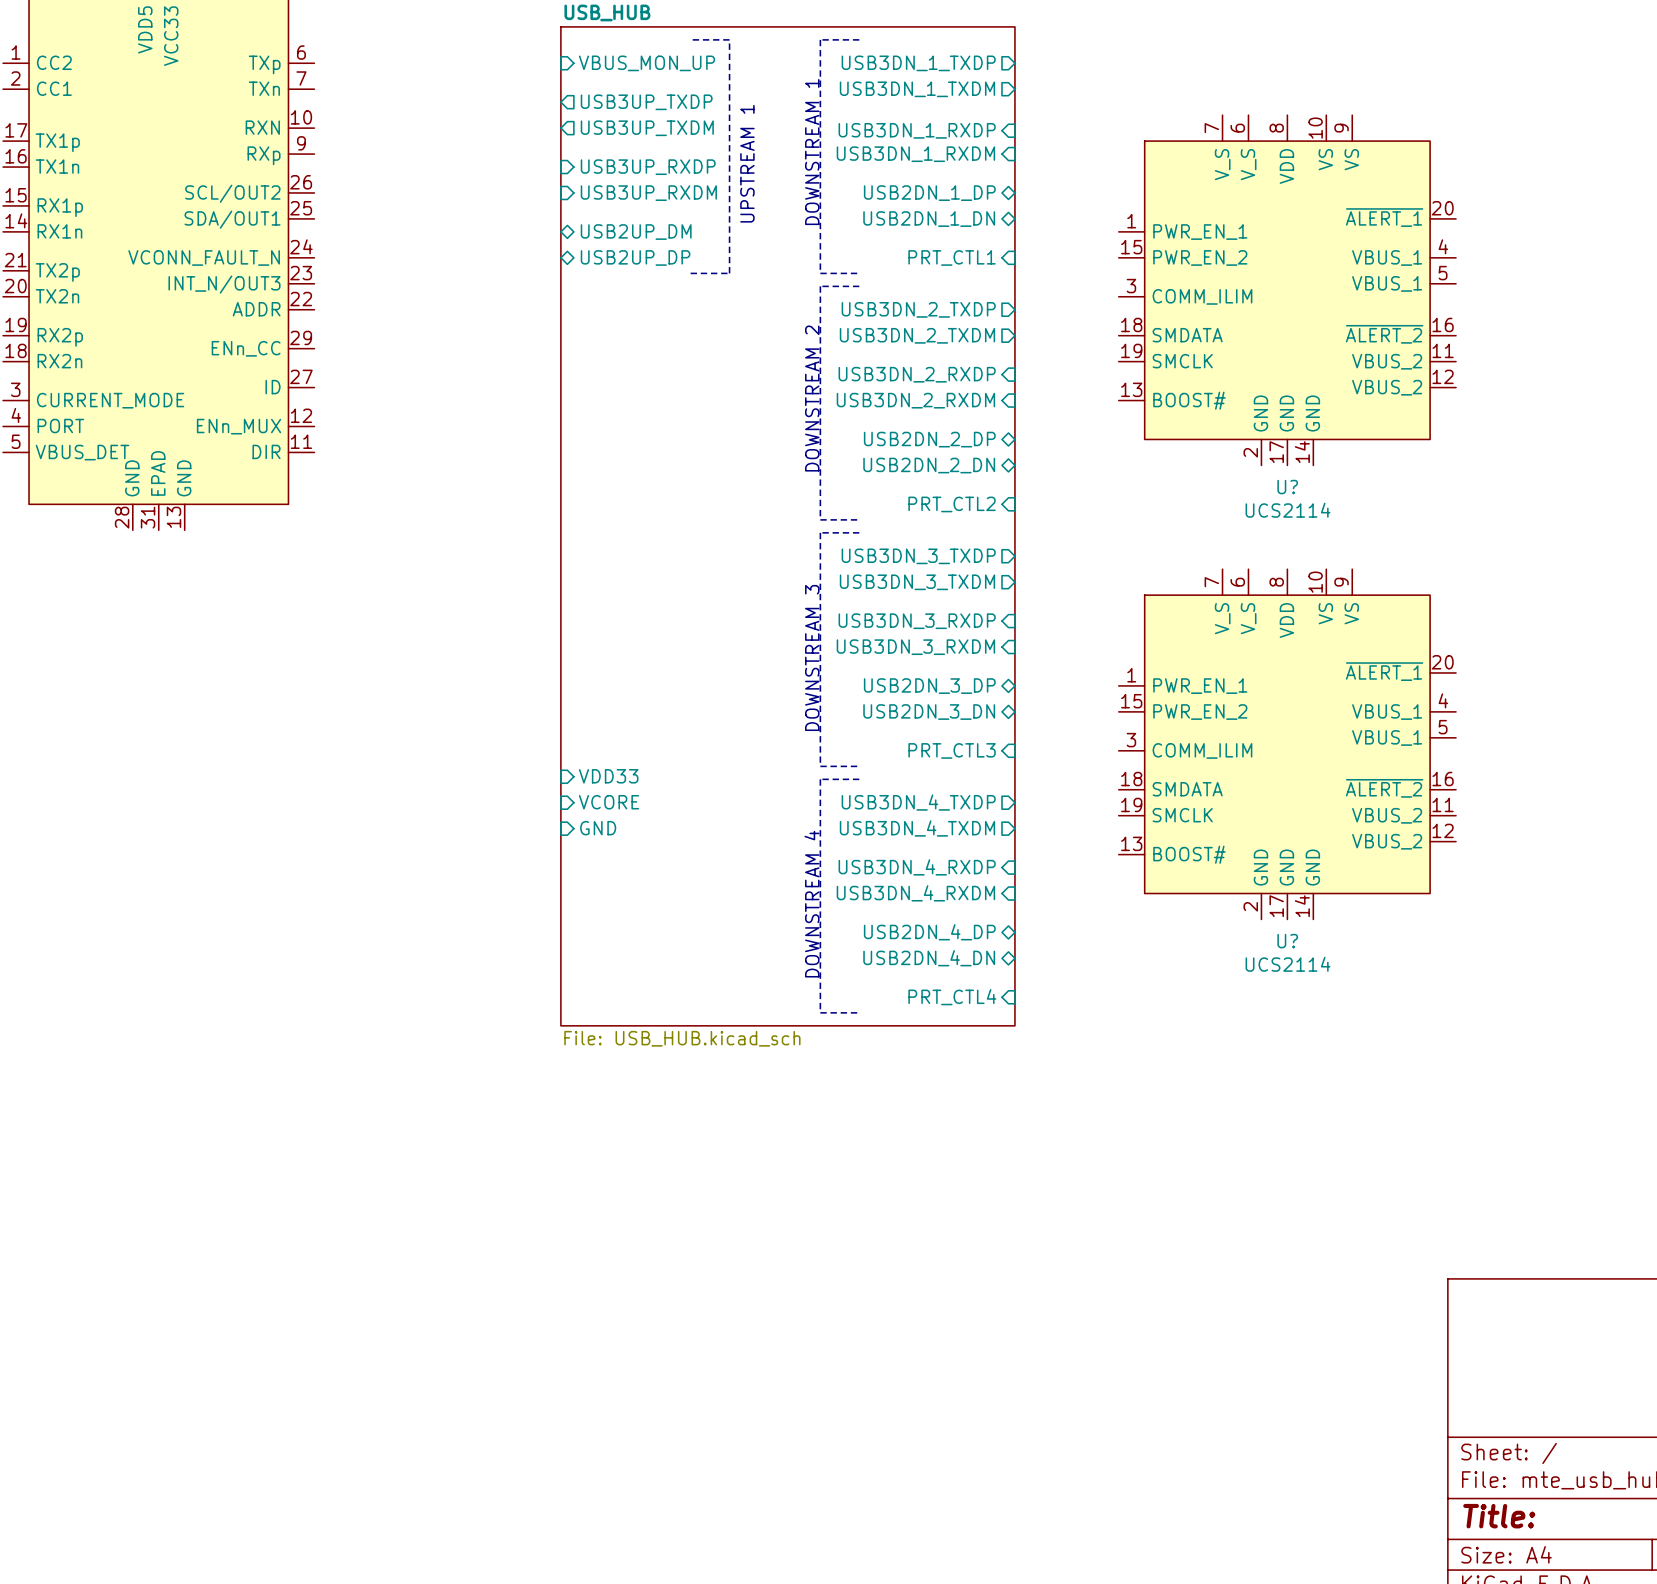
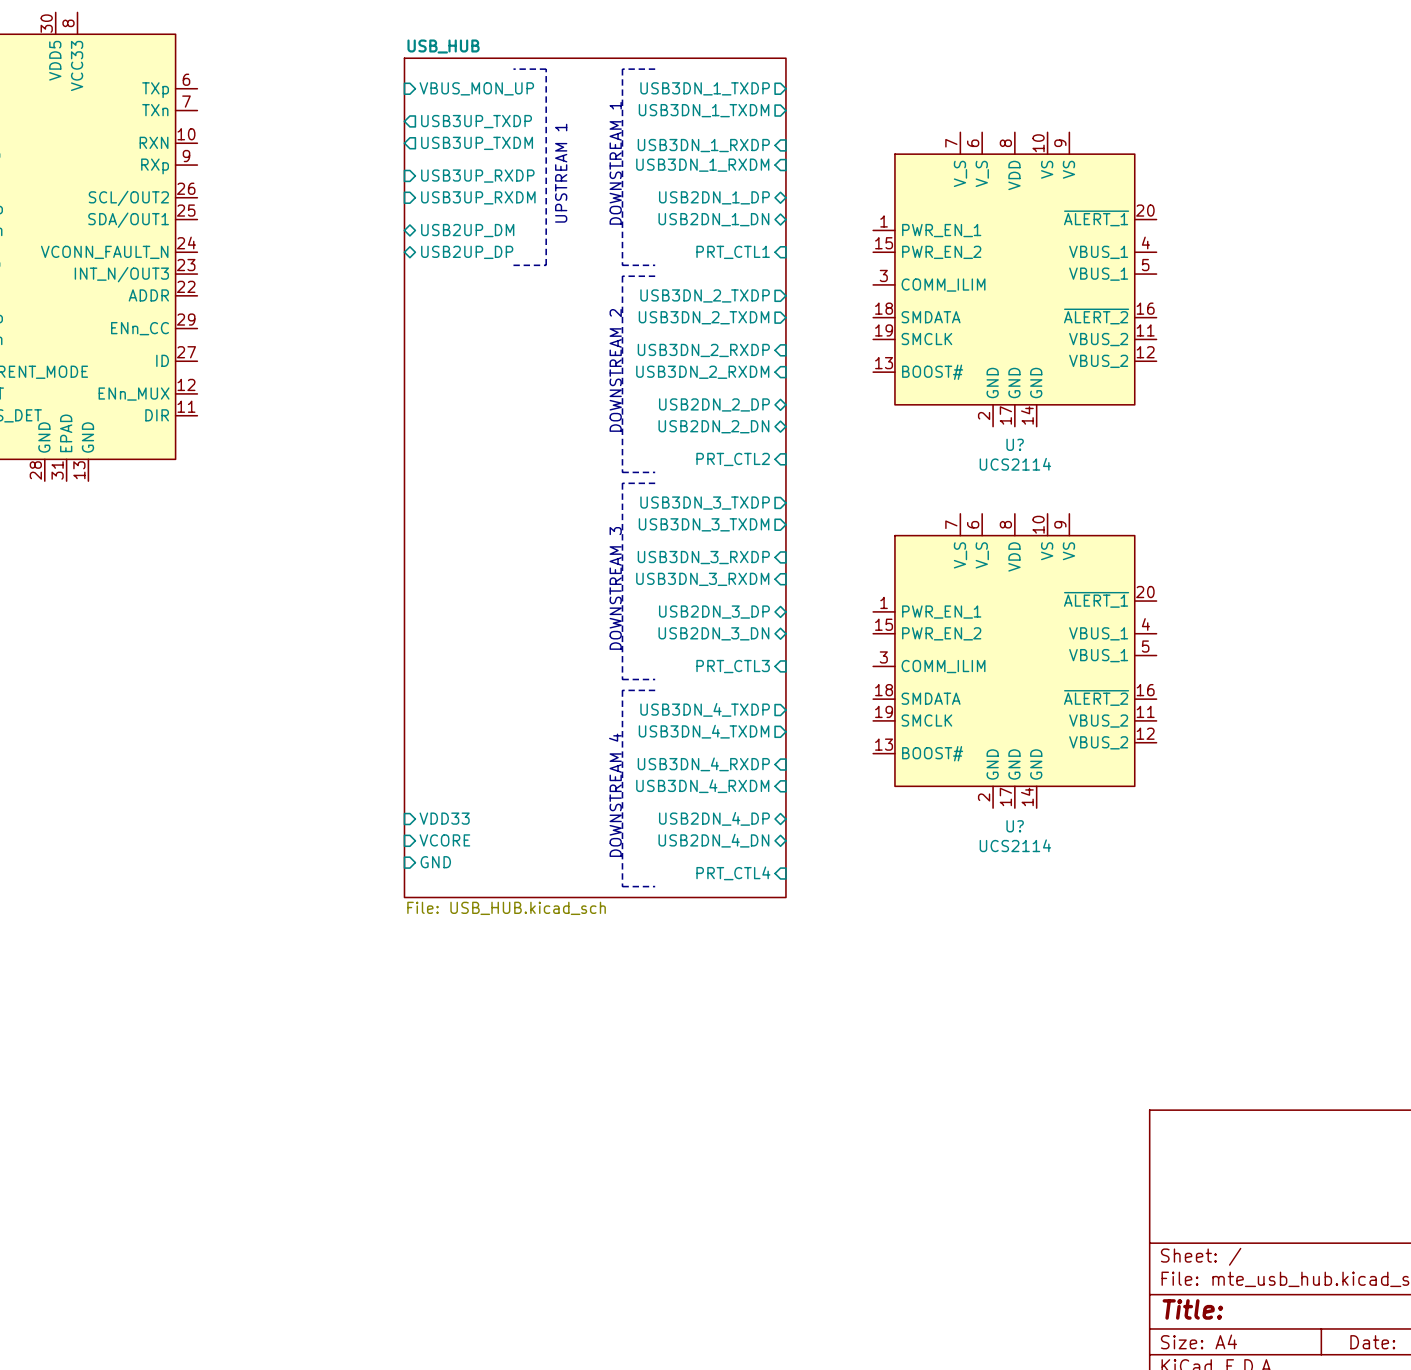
sheet pin position: VDD33 (608, 776) -> VDD33 (444, 818)
sheet pin position: VCORE (608, 802) -> VCORE (444, 840)
sheet pin position: GND (598, 828) -> GND (435, 862)

